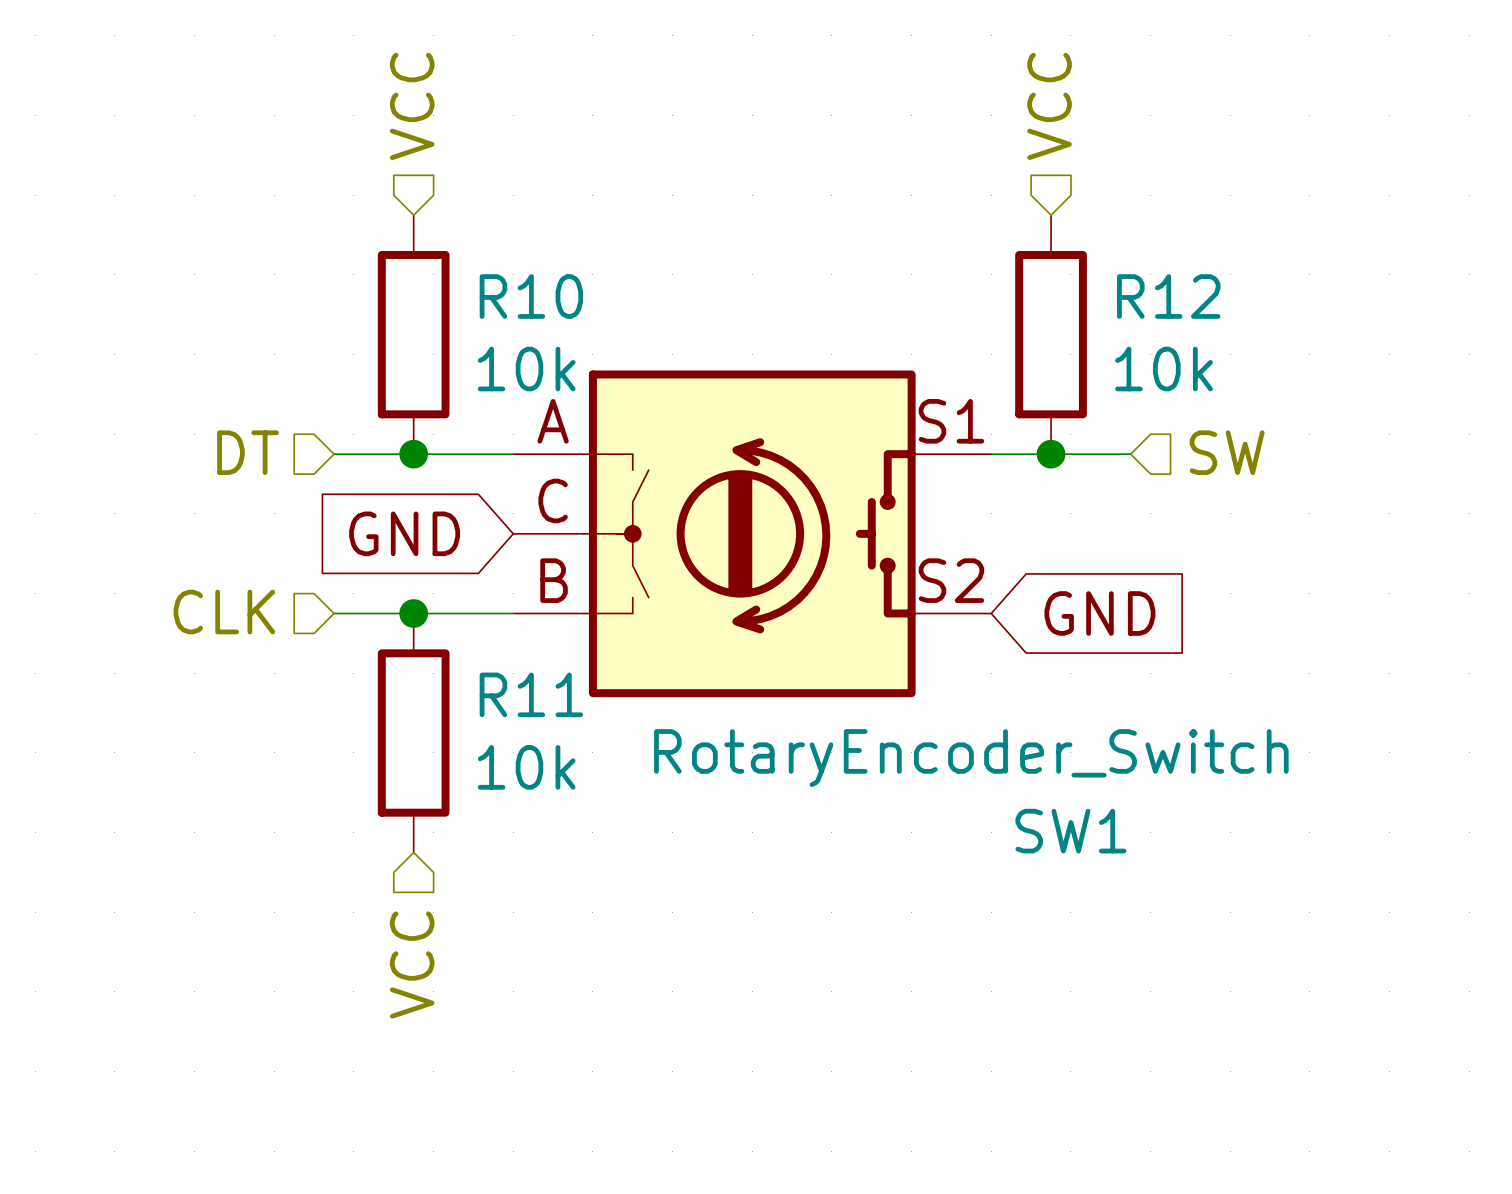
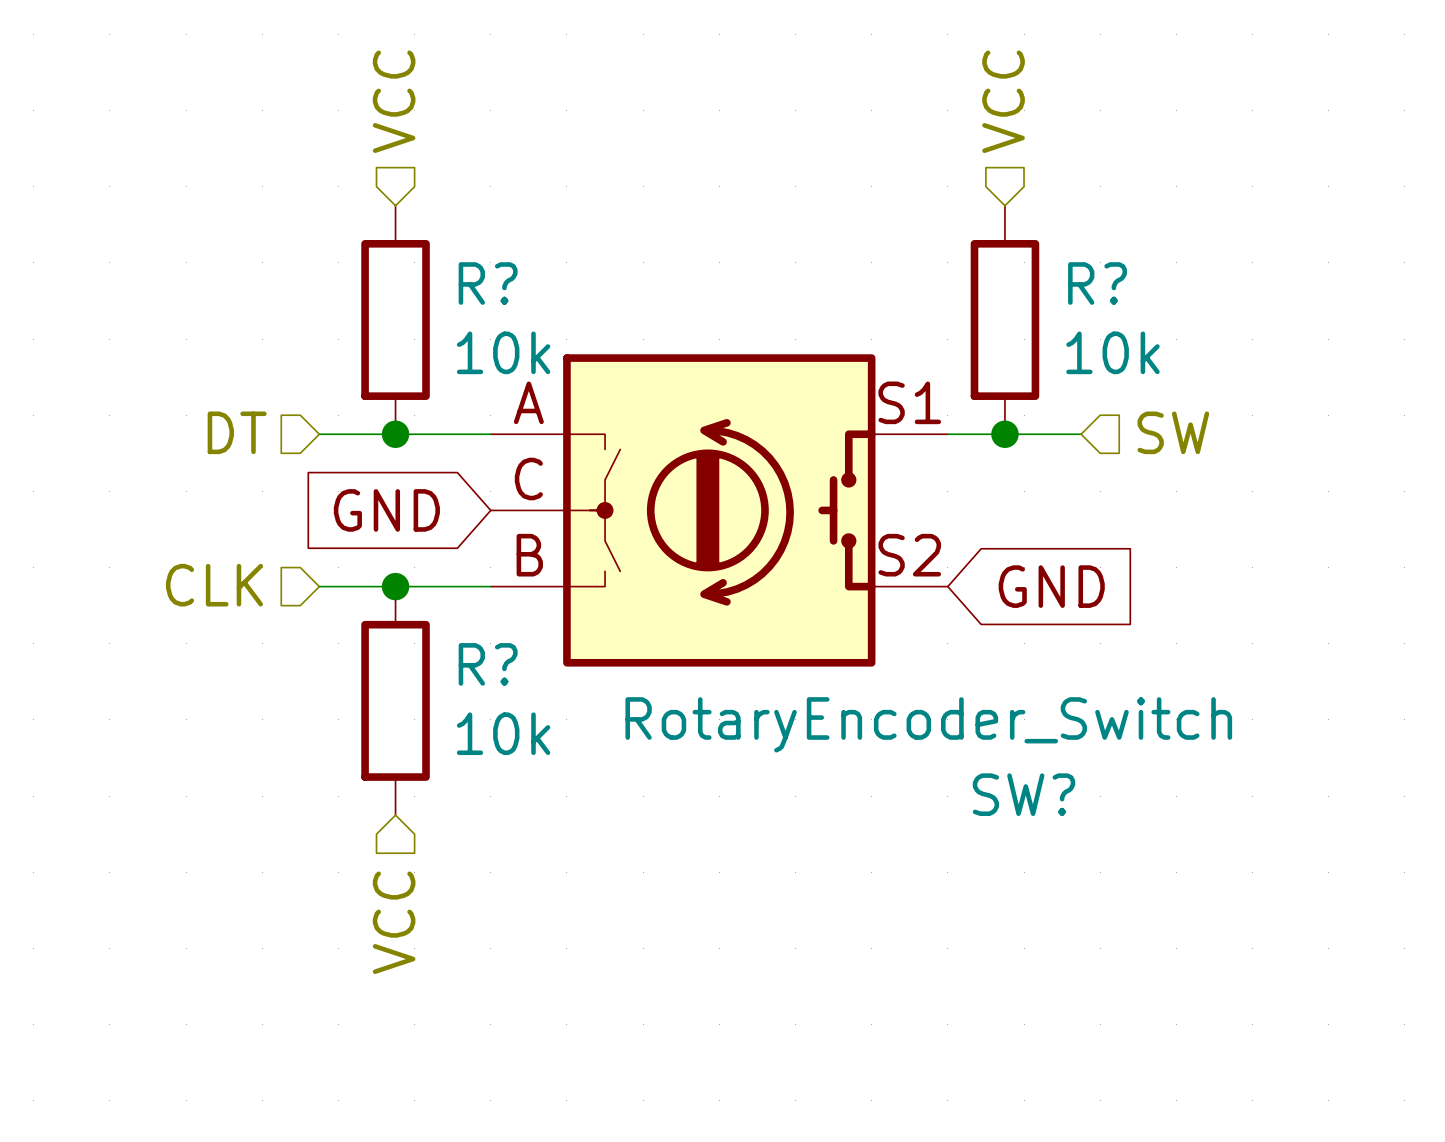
R10 name: R10 (531, 296) -> R? (488, 283)
R12 name: R12 (1168, 296) -> R? (1097, 283)
R11 name: R11 (531, 694) -> R? (488, 664)
SW1 name: SW1 (1070, 831) -> SW? (1024, 794)

